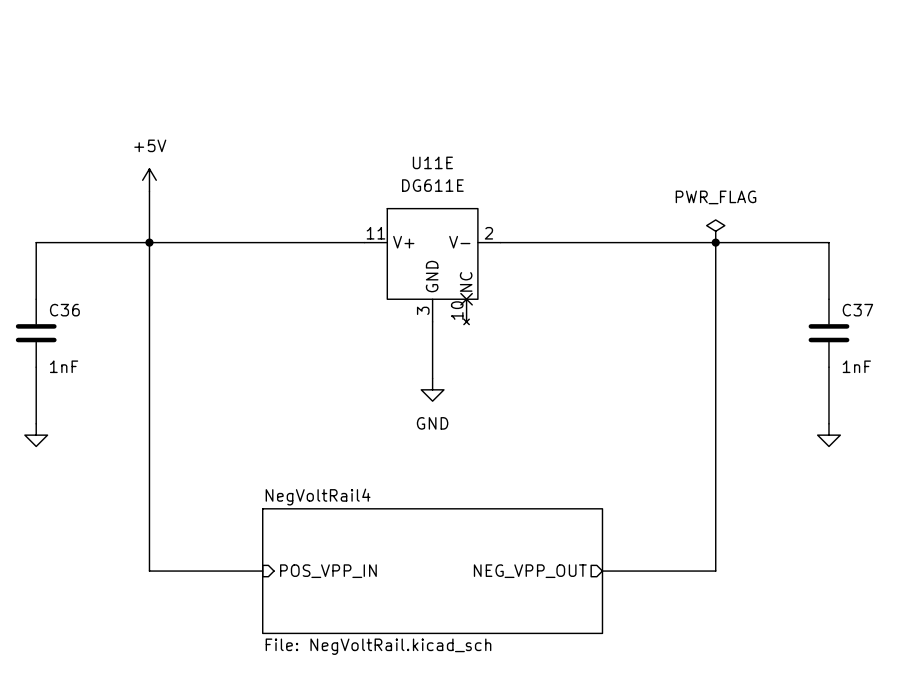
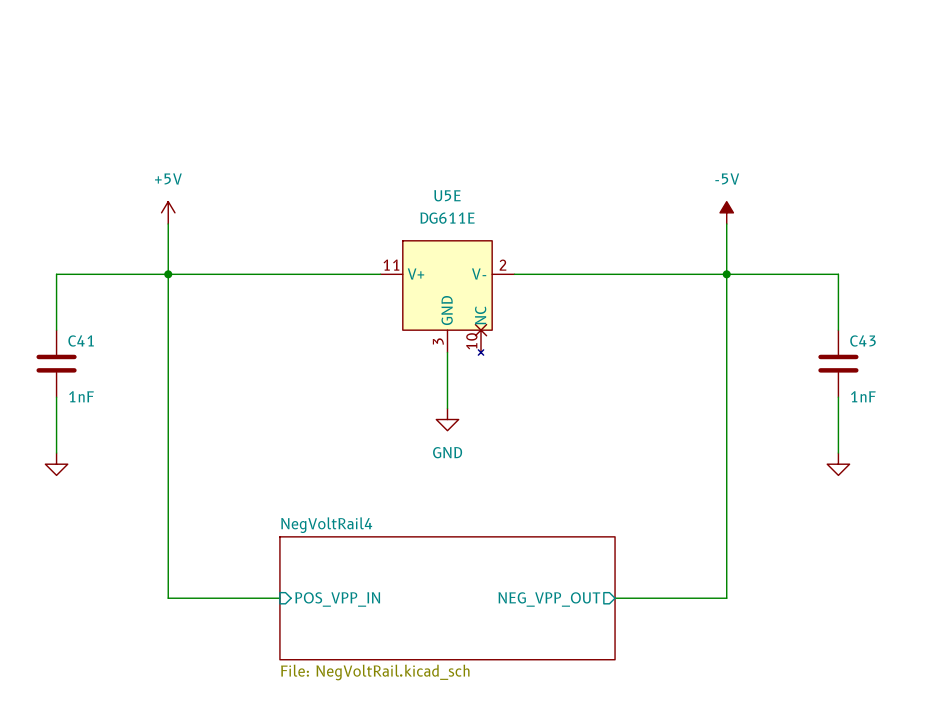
U11E name: U11E (432, 162) -> U5E (447, 195)
power symbol: none -> -5V (726, 212)
wire: none -> (726, 223) (726, 274)
power symbol: PWR_FLAG (715, 231) -> none
C36 name: C36 (64, 310) -> C41 (81, 340)
C37 name: C37 (857, 310) -> C43 (862, 340)

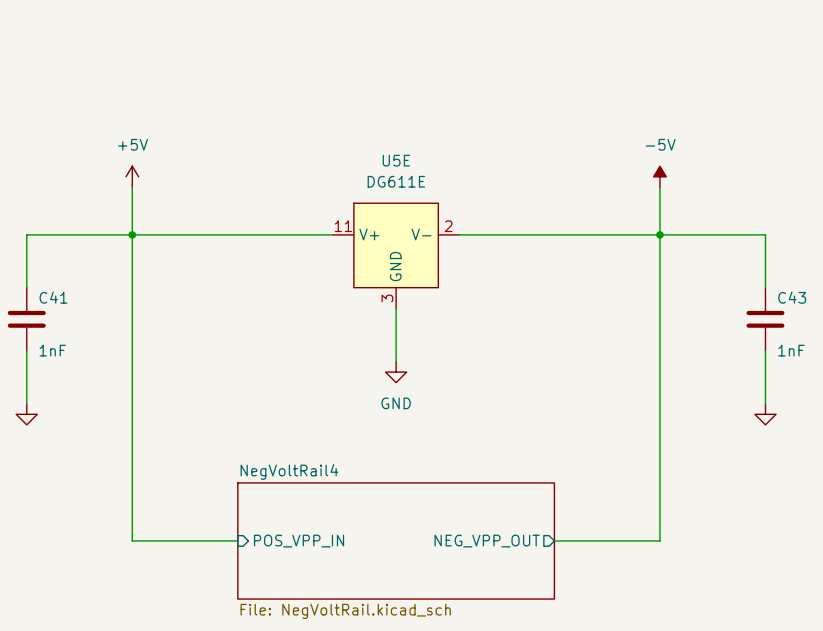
U5E symbol: [380, 240, 515, 356] -> [332, 203, 460, 309]

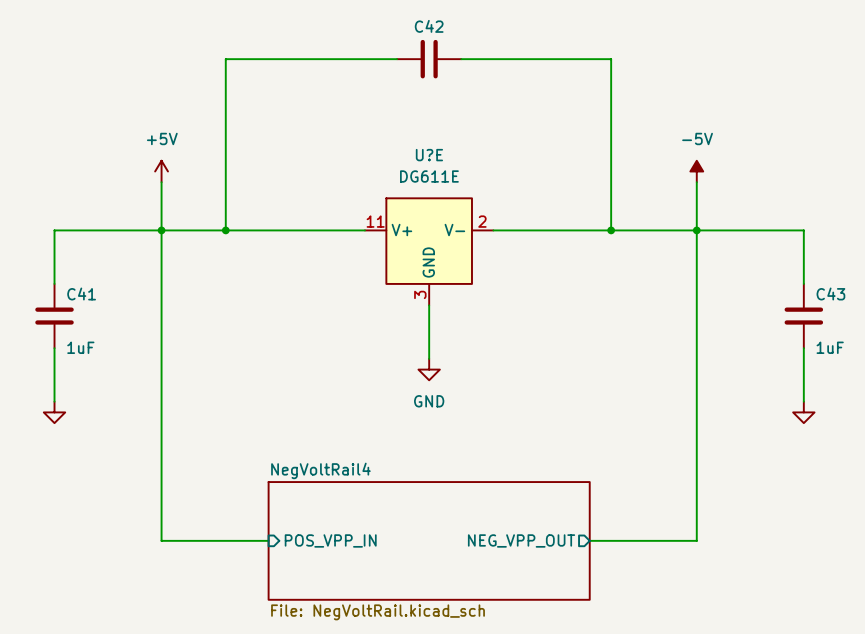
wire: none -> (397, 59) (225, 59) (225, 230)
C42: none -> (429, 59)
wire: none -> (461, 59) (611, 59) (611, 230)
U5E name: U5E (396, 160) -> U?E (429, 155)
junction: none -> (225, 230)
junction: none -> (611, 230)
C41 value: 1nF (52, 350) -> 1uF (80, 347)
C43 value: 1nF (791, 350) -> 1uF (830, 347)

